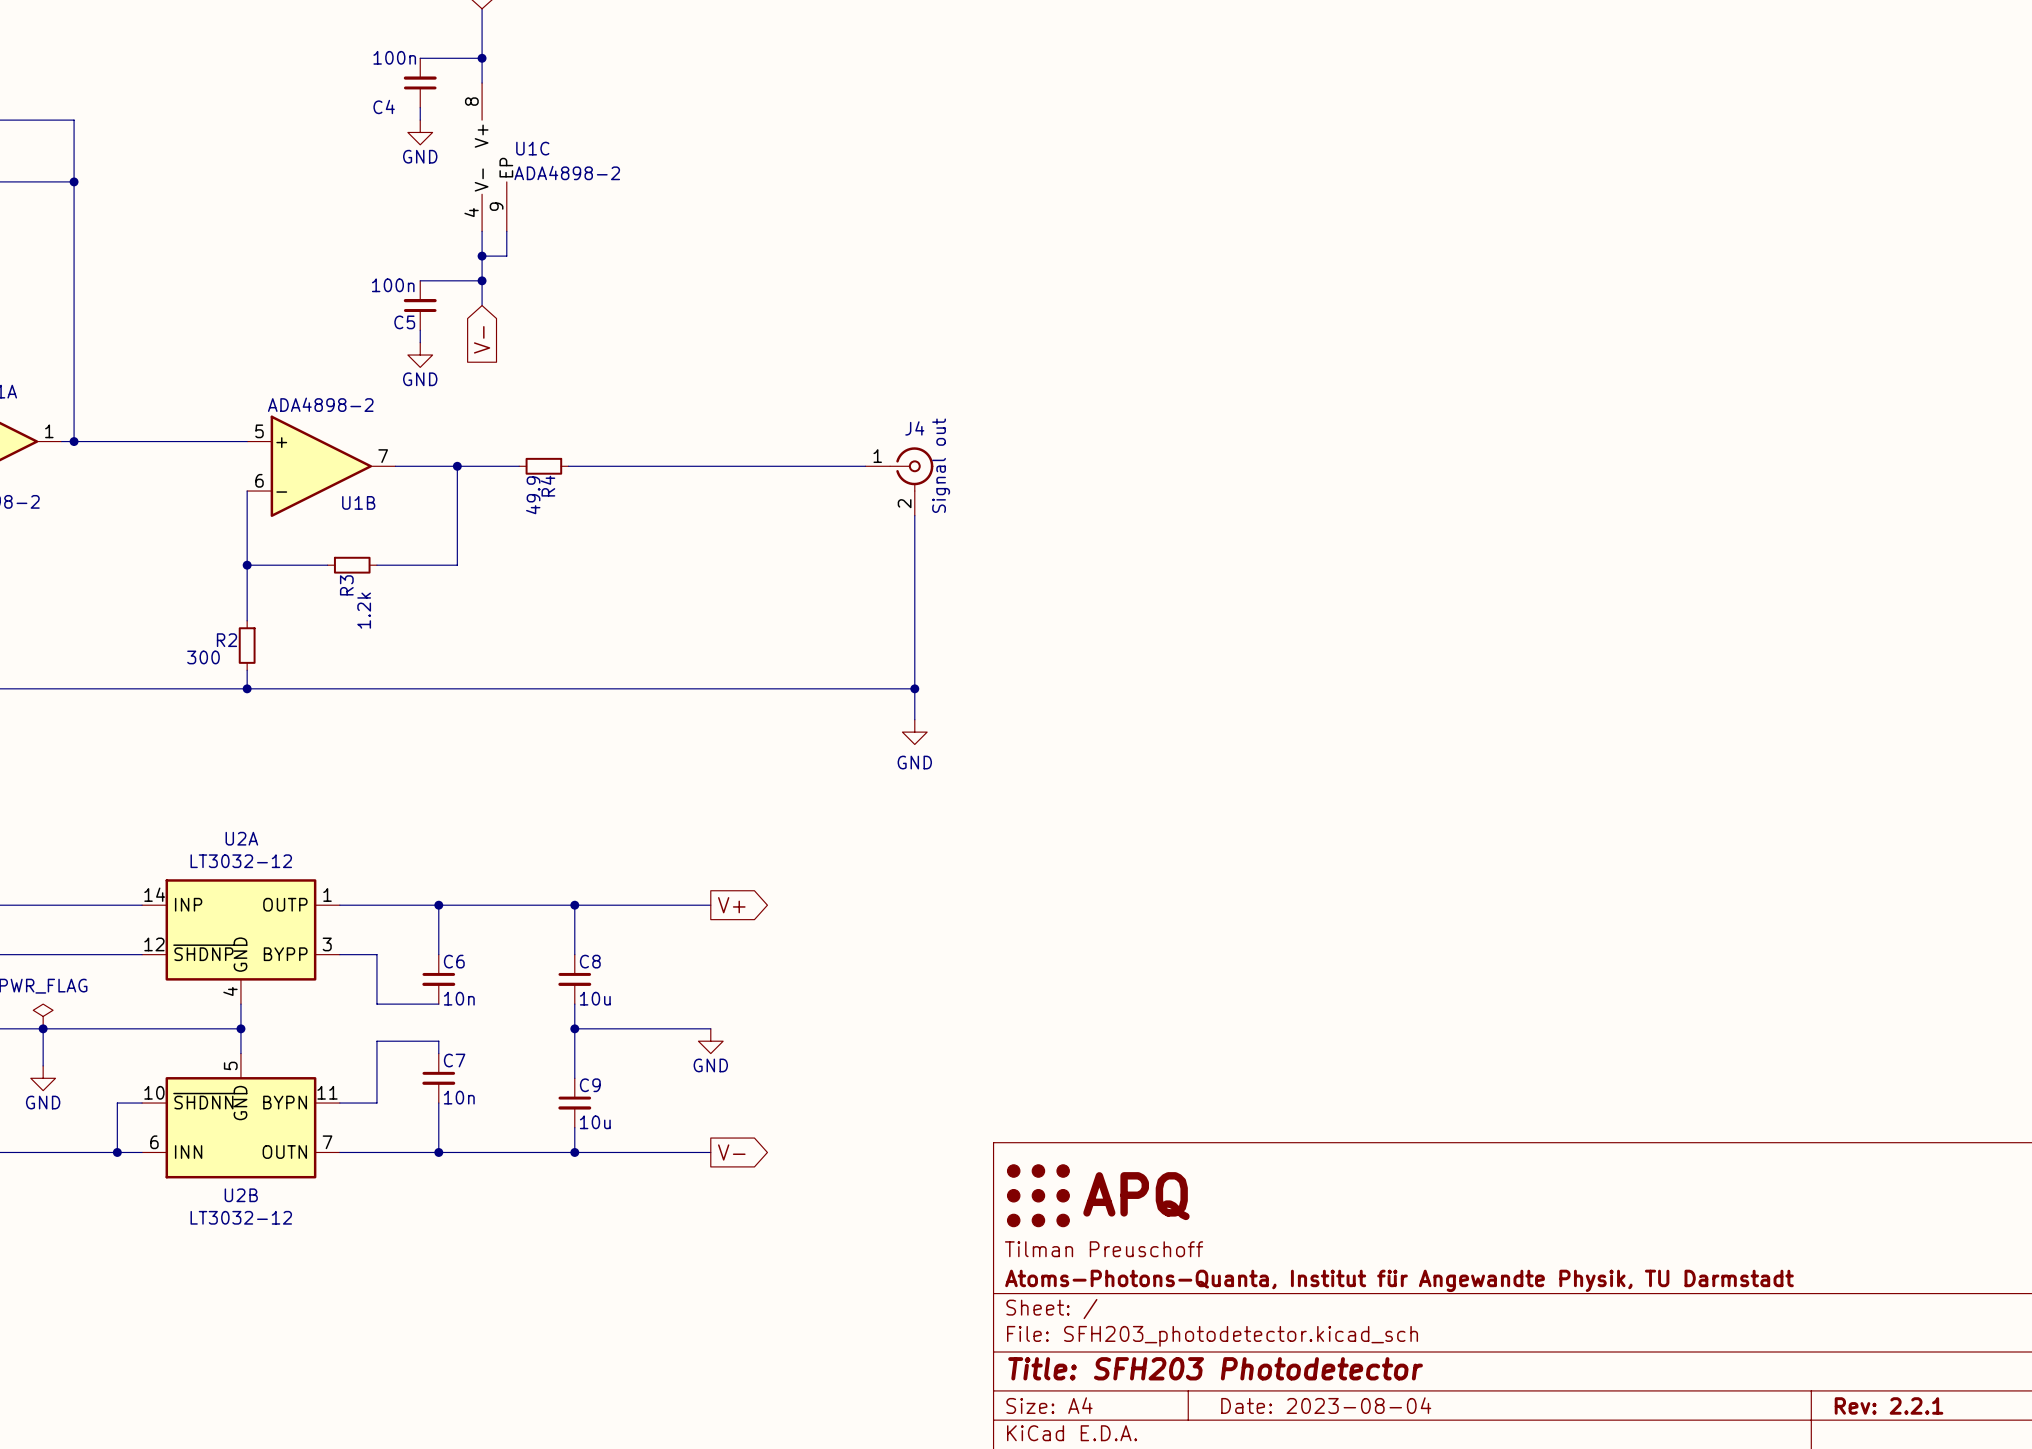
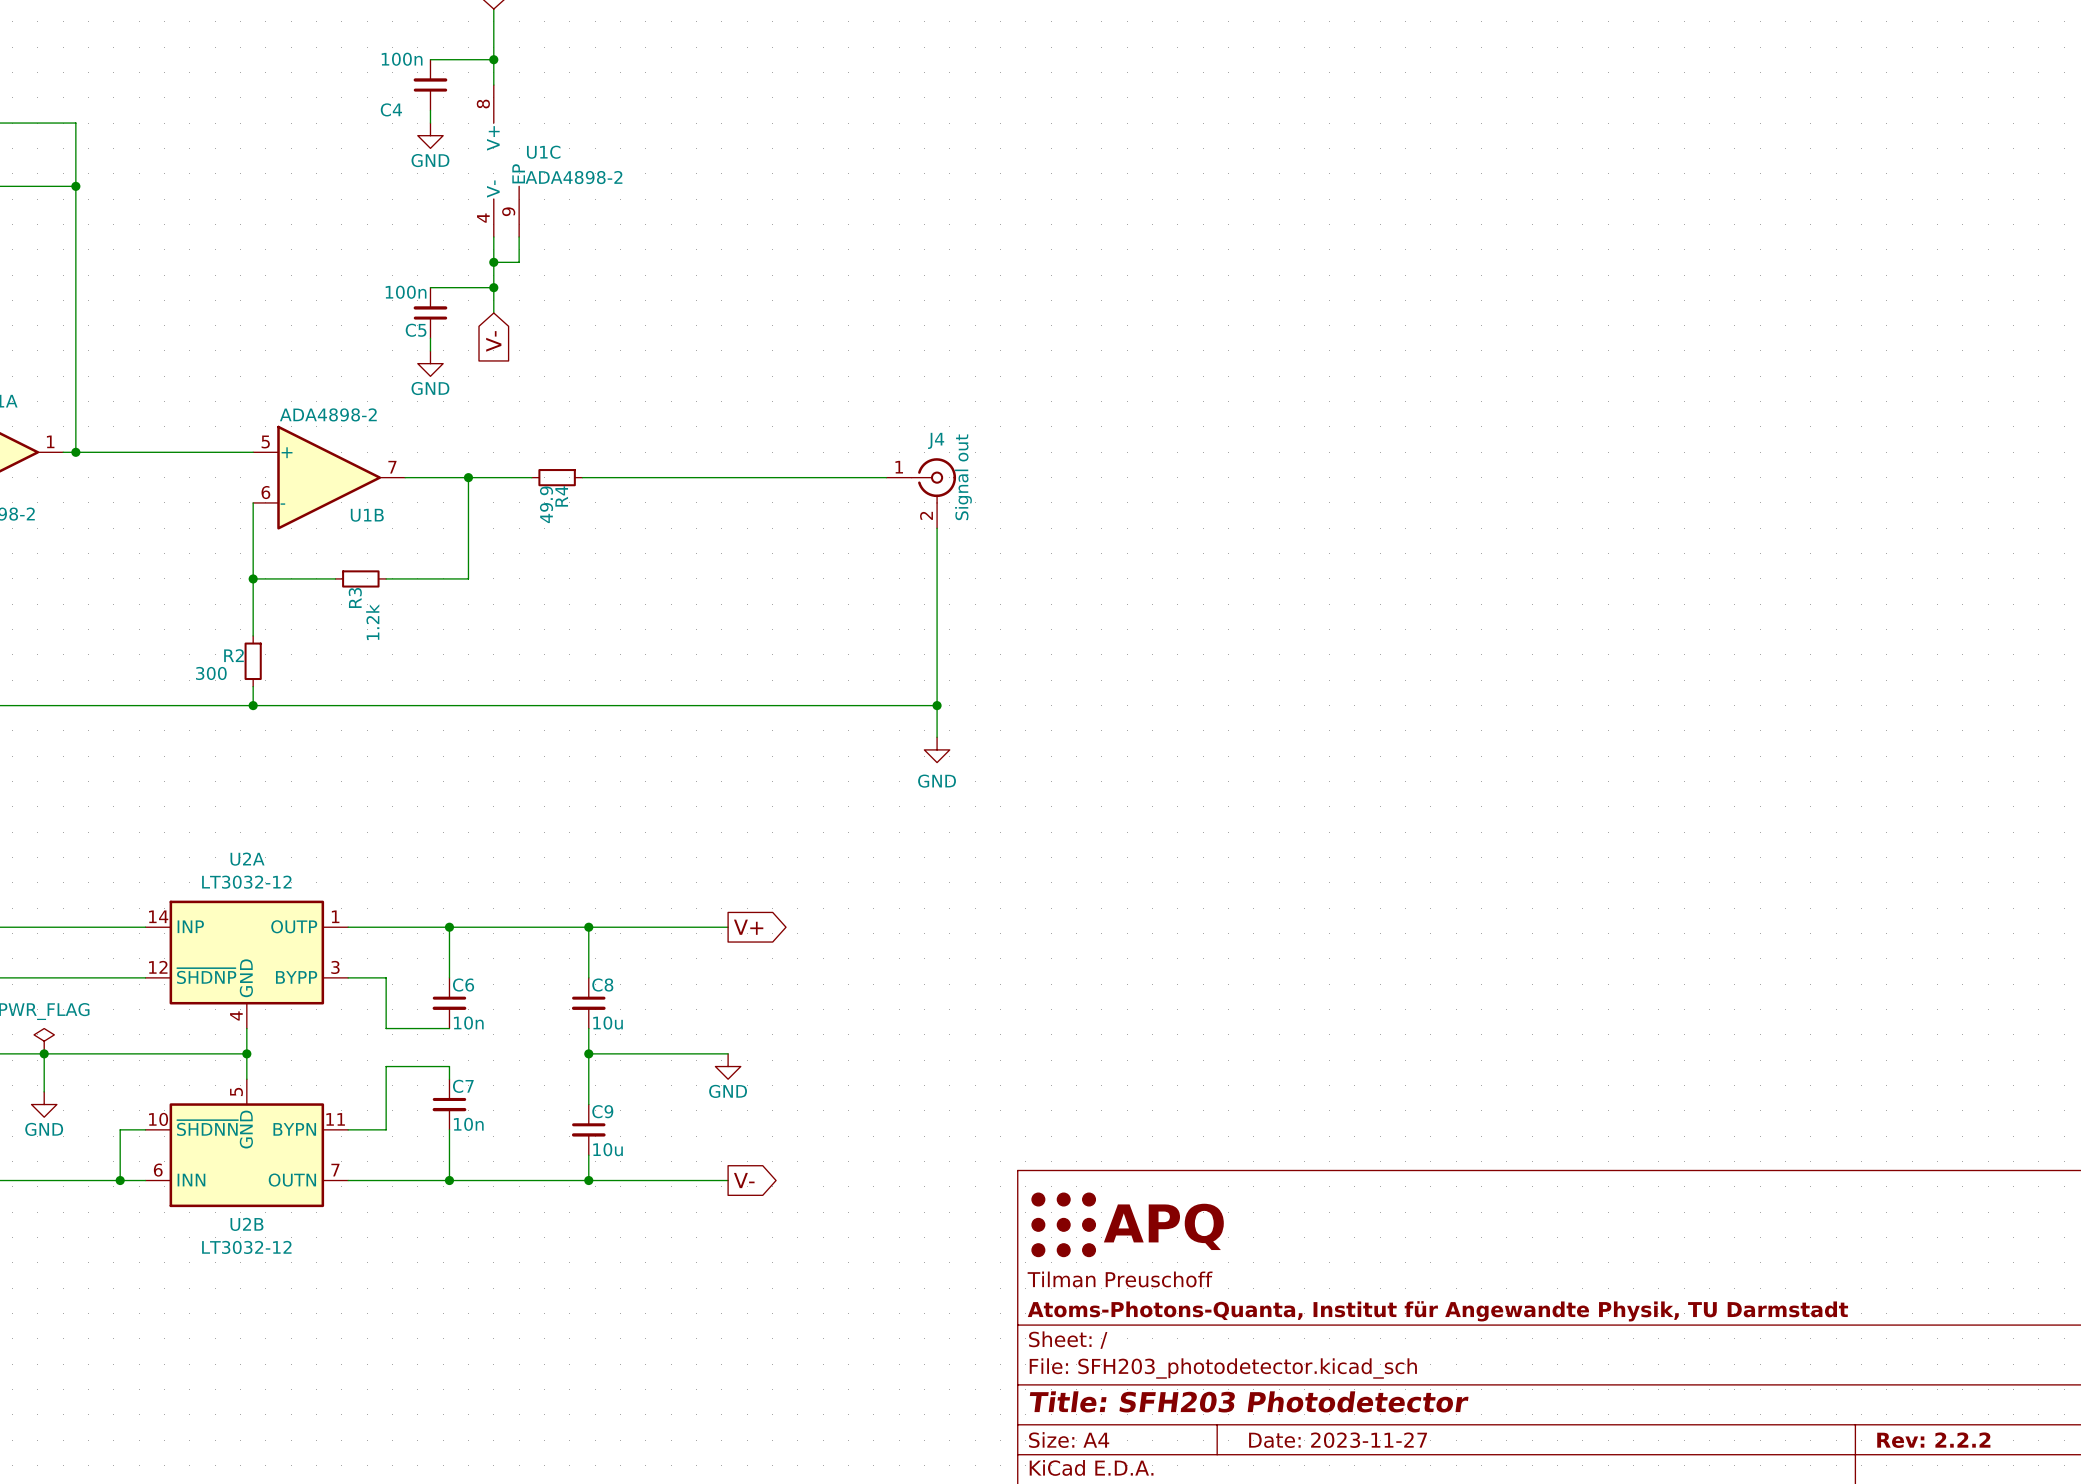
title block: Date: 2023-08-04 (1326, 1405) -> Date: 2023-11-27 (1338, 1440)
title block: Rev: 2.2.1 (1889, 1405) -> Rev: 2.2.2 (1933, 1440)

